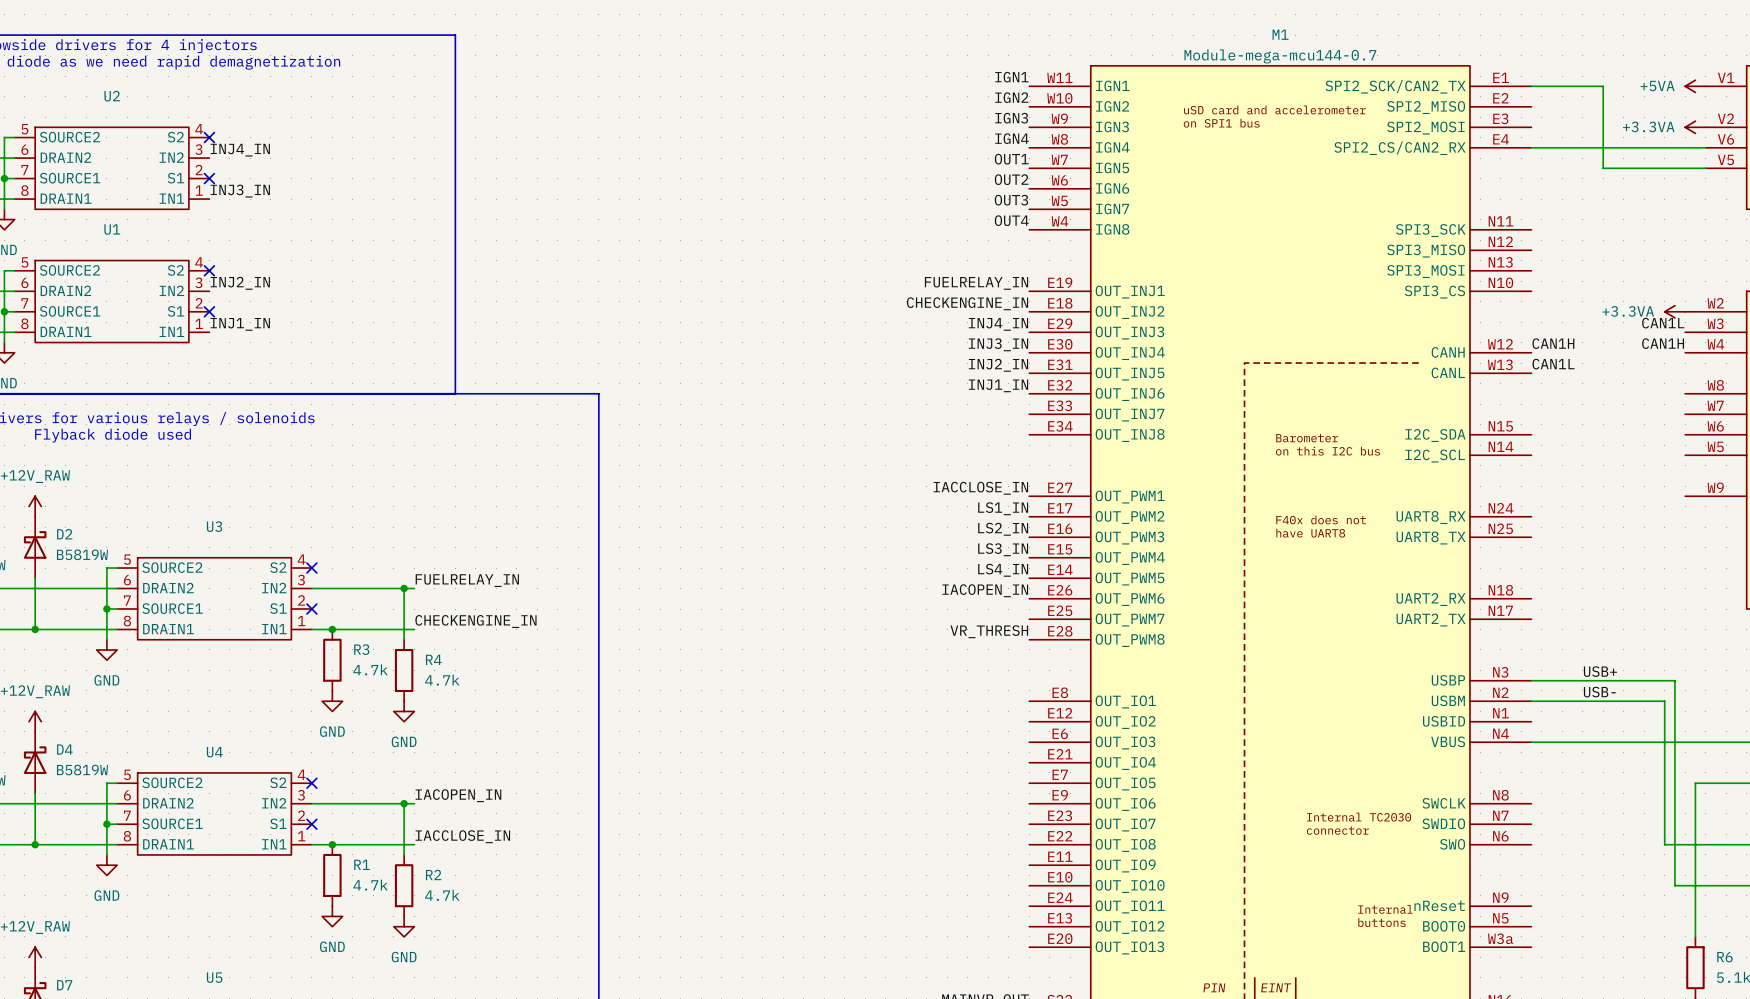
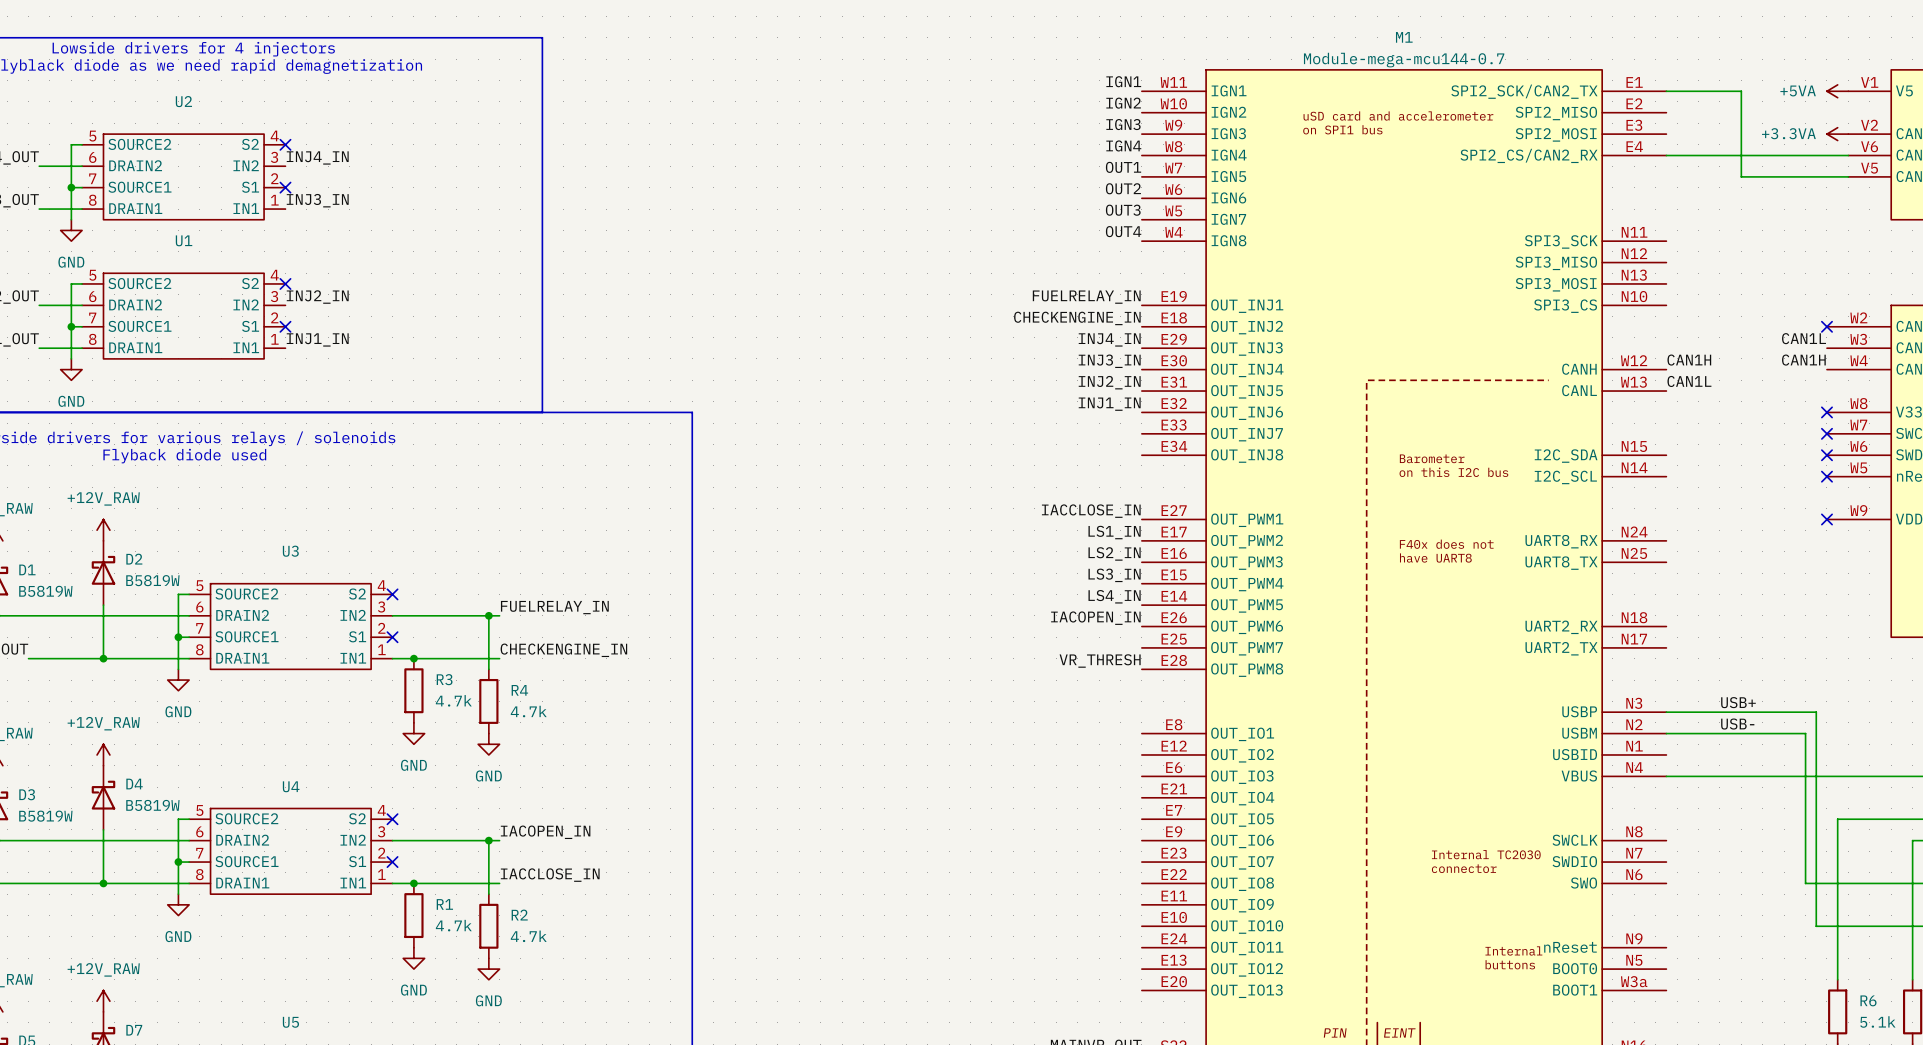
power symbol: +3.3VA (1674, 311) -> none
no-connect mark: none -> (1826, 326)
no-connect mark: none -> (1826, 412)
no-connect mark: none -> (1826, 433)
no-connect mark: none -> (1826, 455)
no-connect mark: none -> (1826, 476)
no-connect mark: none -> (1826, 519)

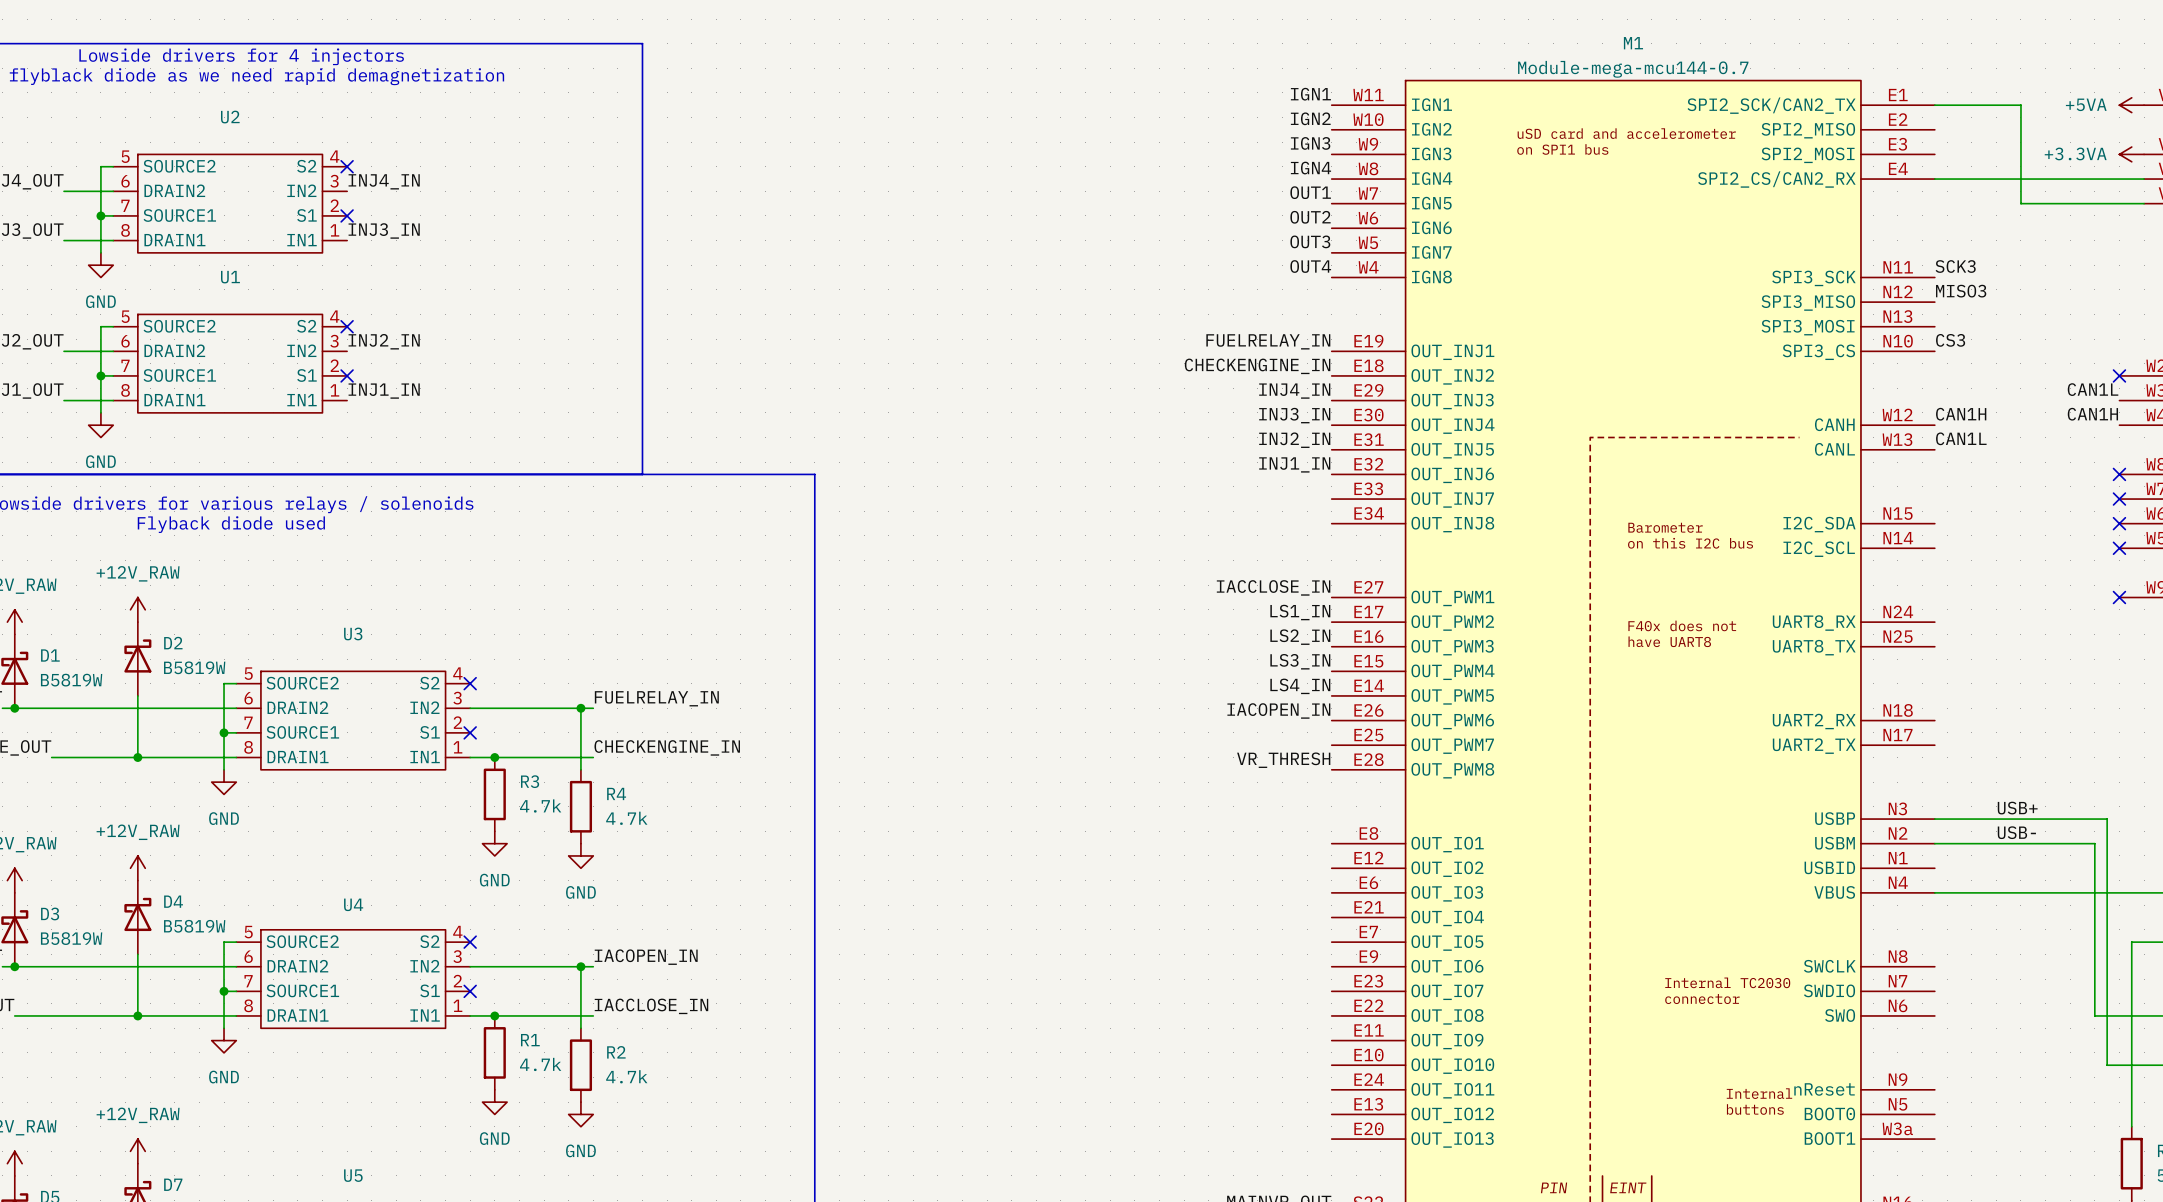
label: none -> SCK3 (1955, 266)
label: none -> MISO3 (1961, 291)
label: none -> CS3 (1950, 340)

